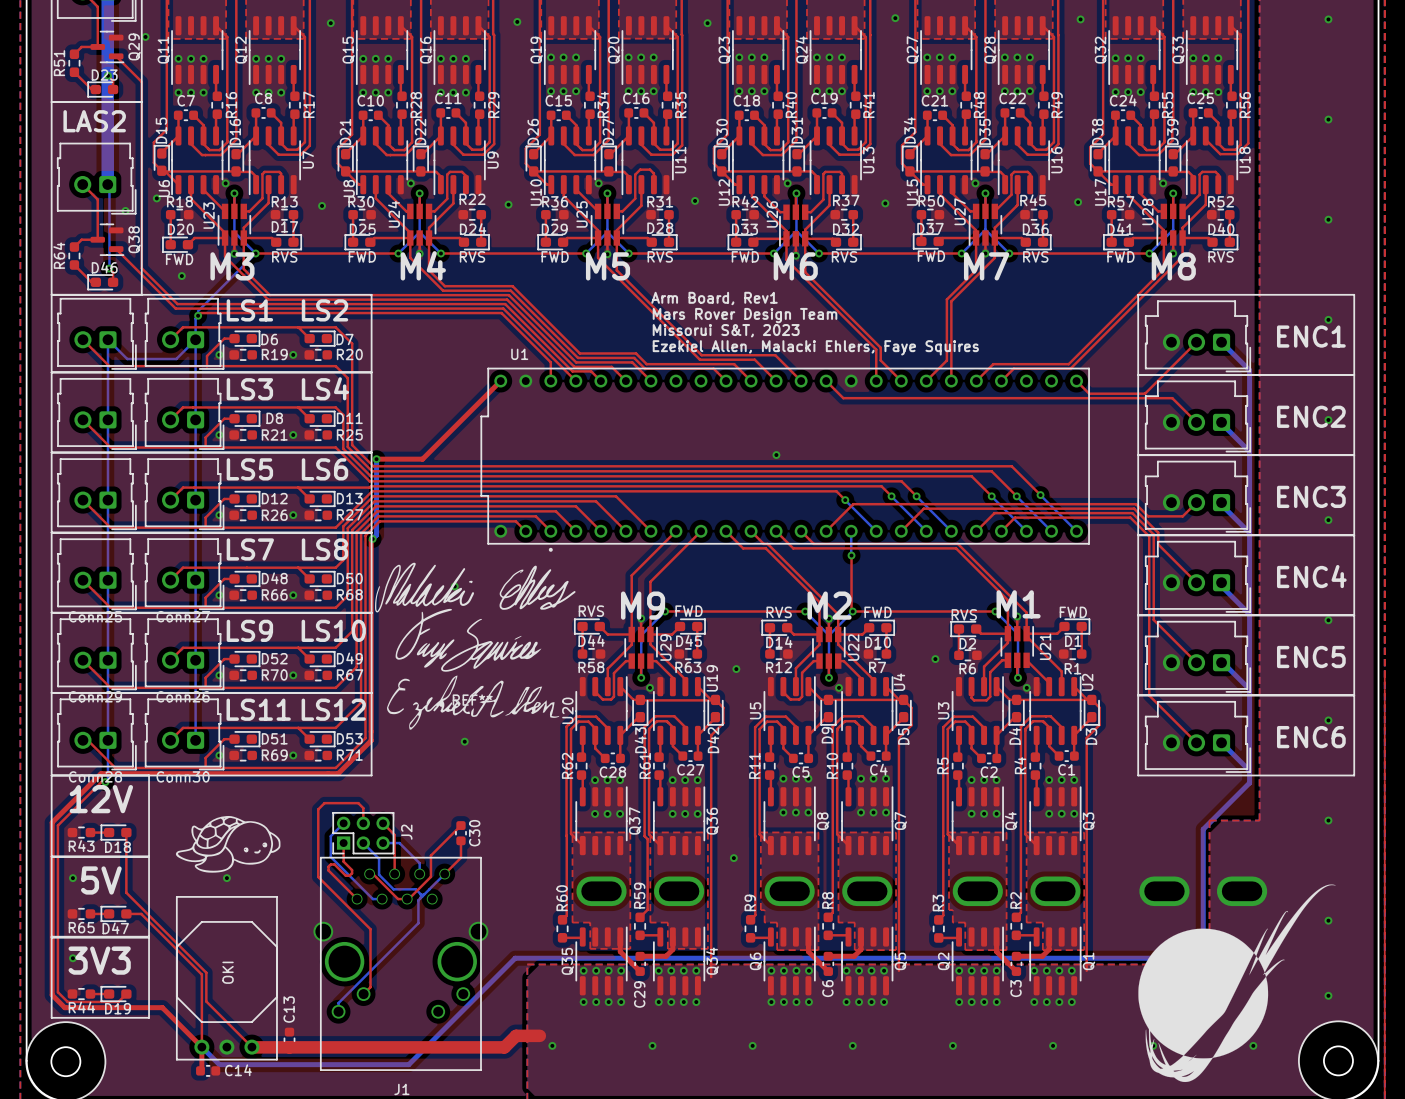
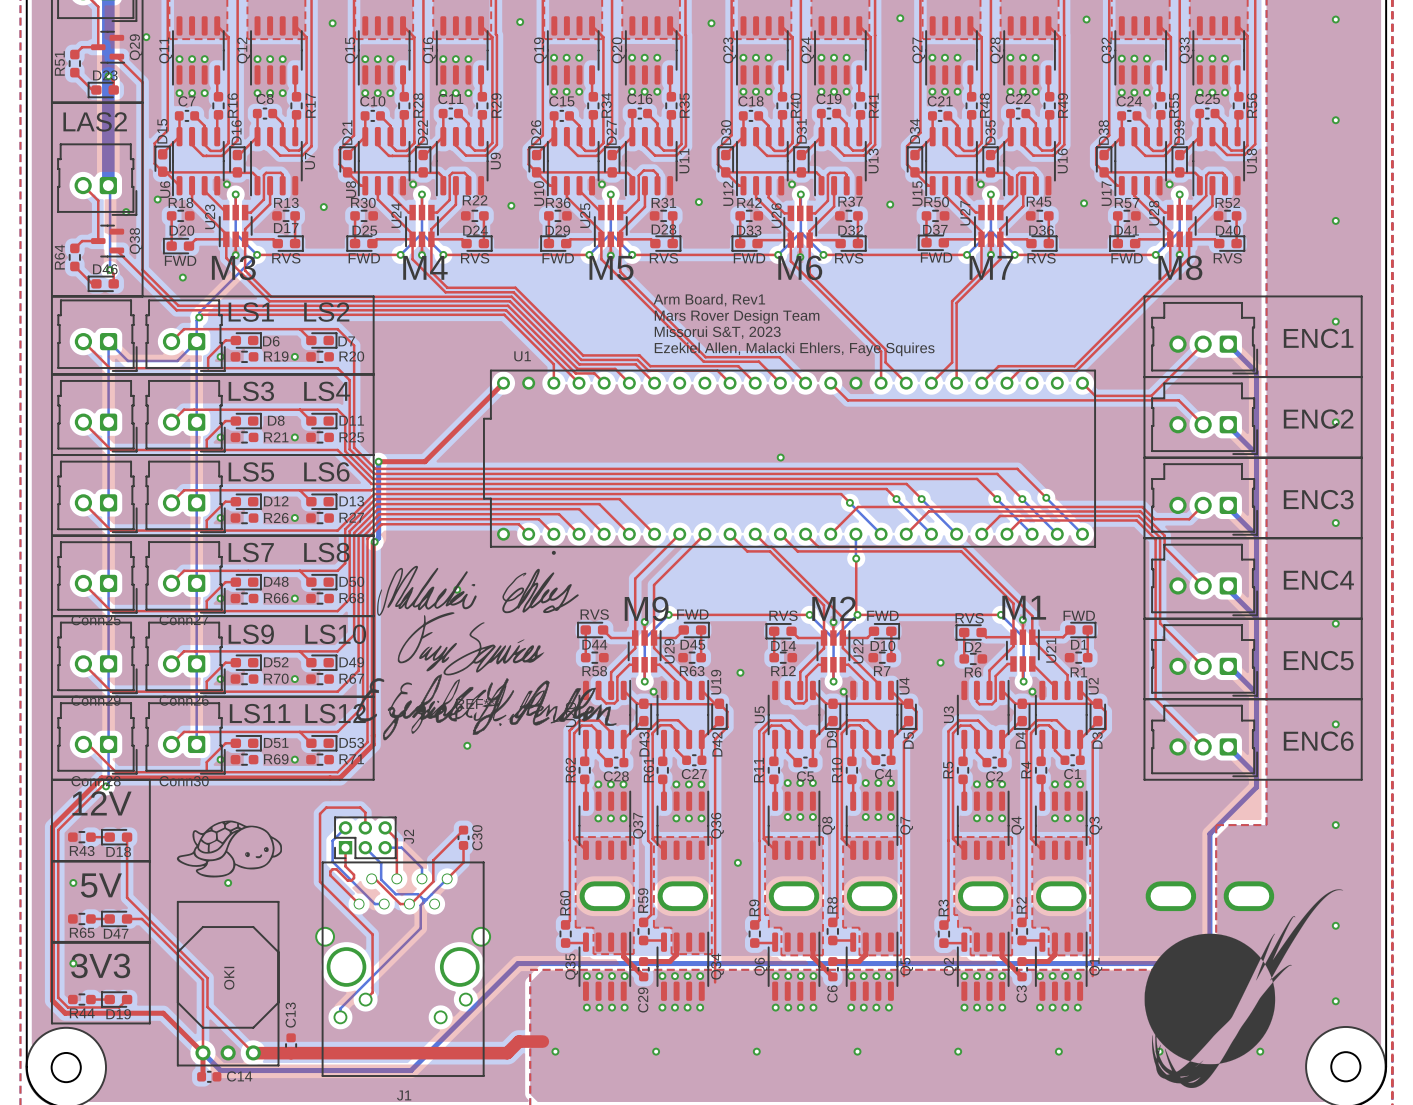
drawing: none -> [356, 674, 617, 741]

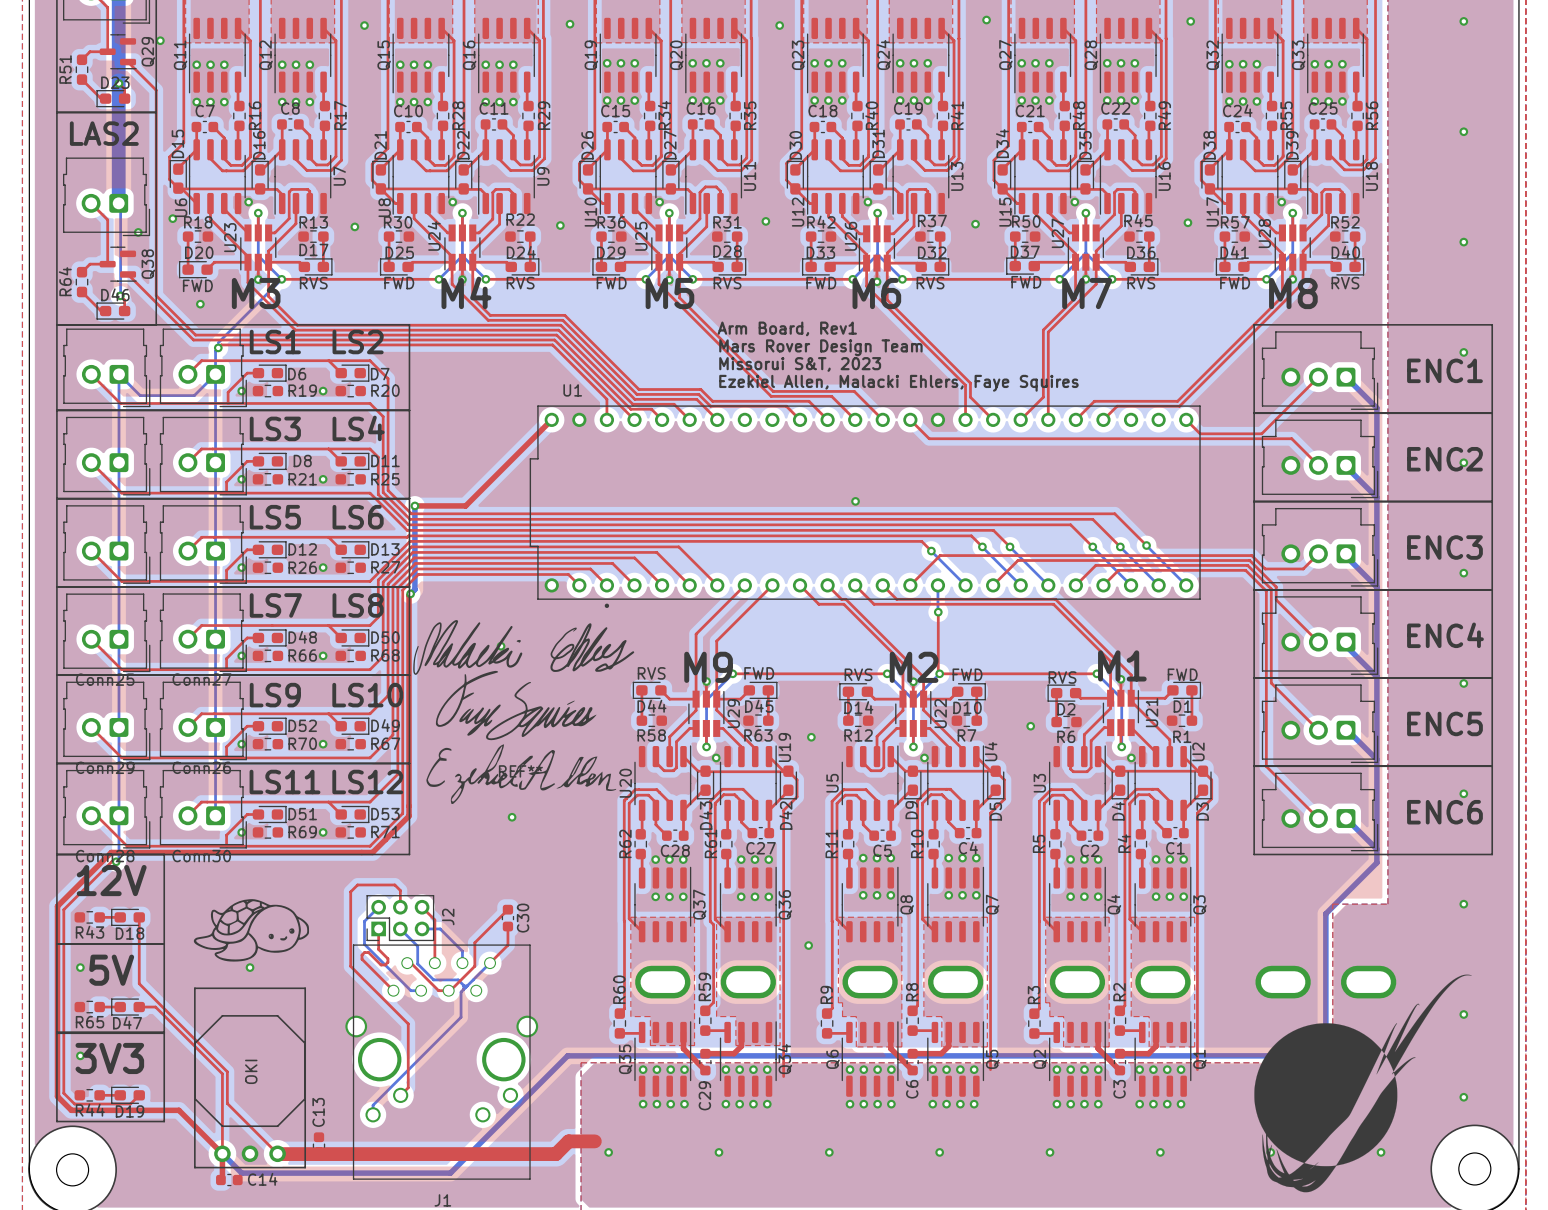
drawing: [356, 674, 617, 741] -> none

